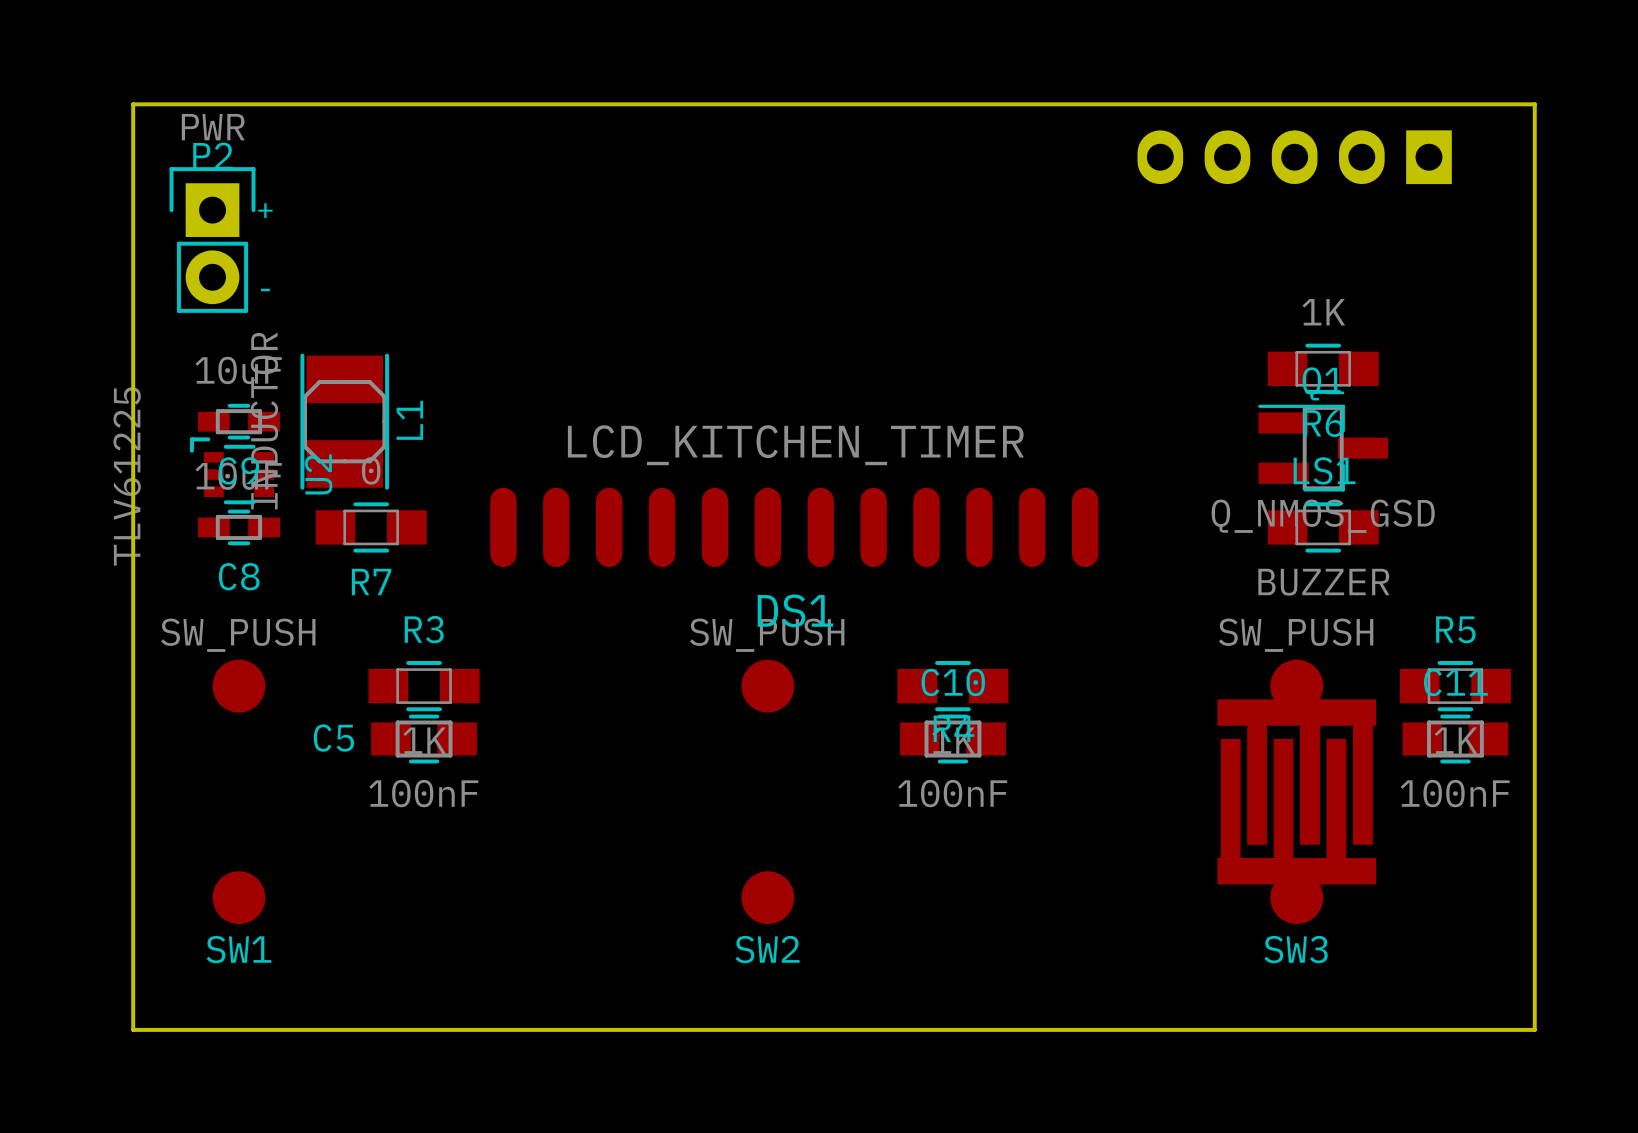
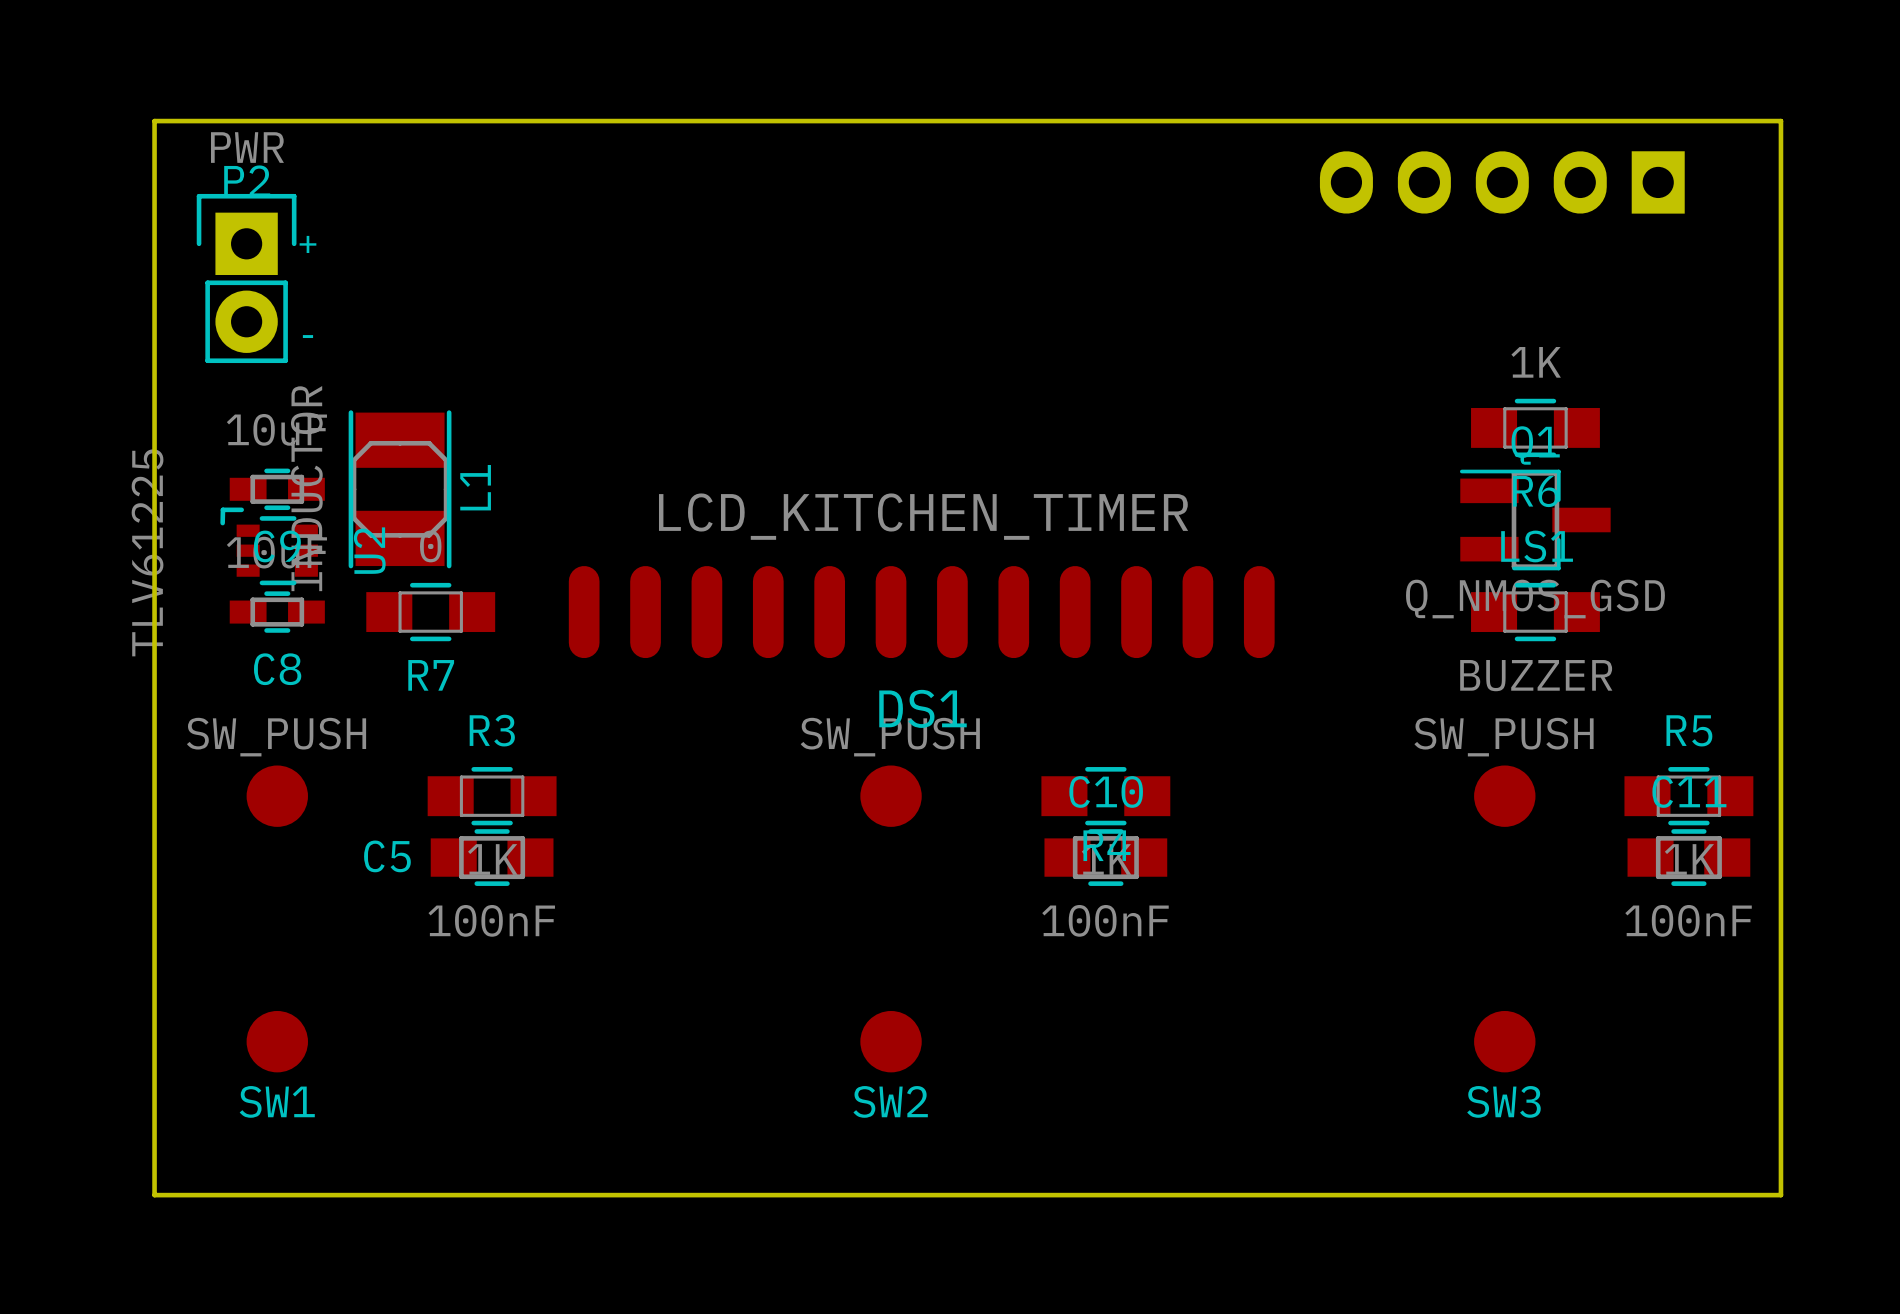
SW3 footprint: [1217, 659, 1377, 925] -> [1474, 765, 1536, 1073]

